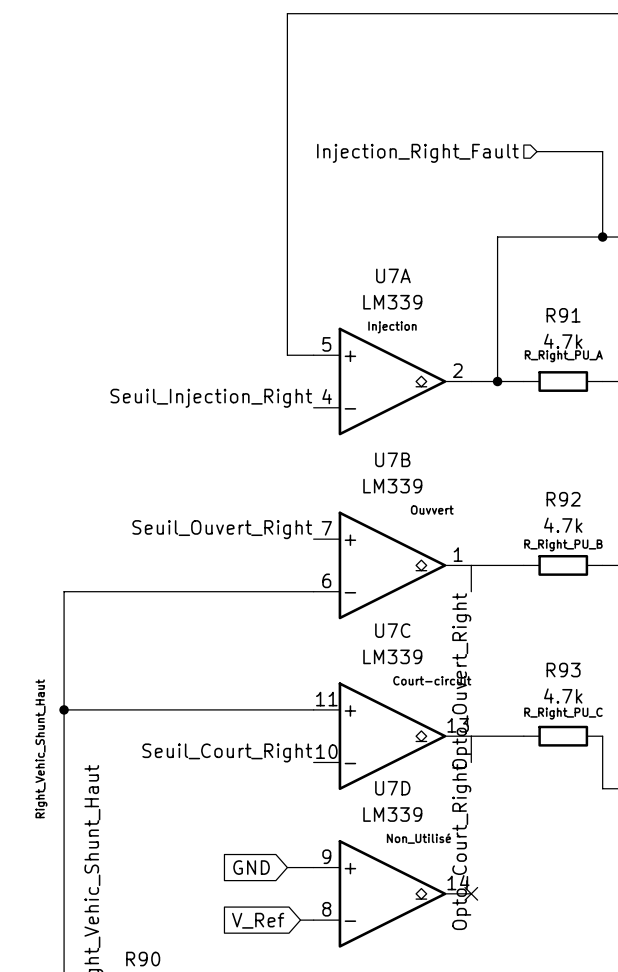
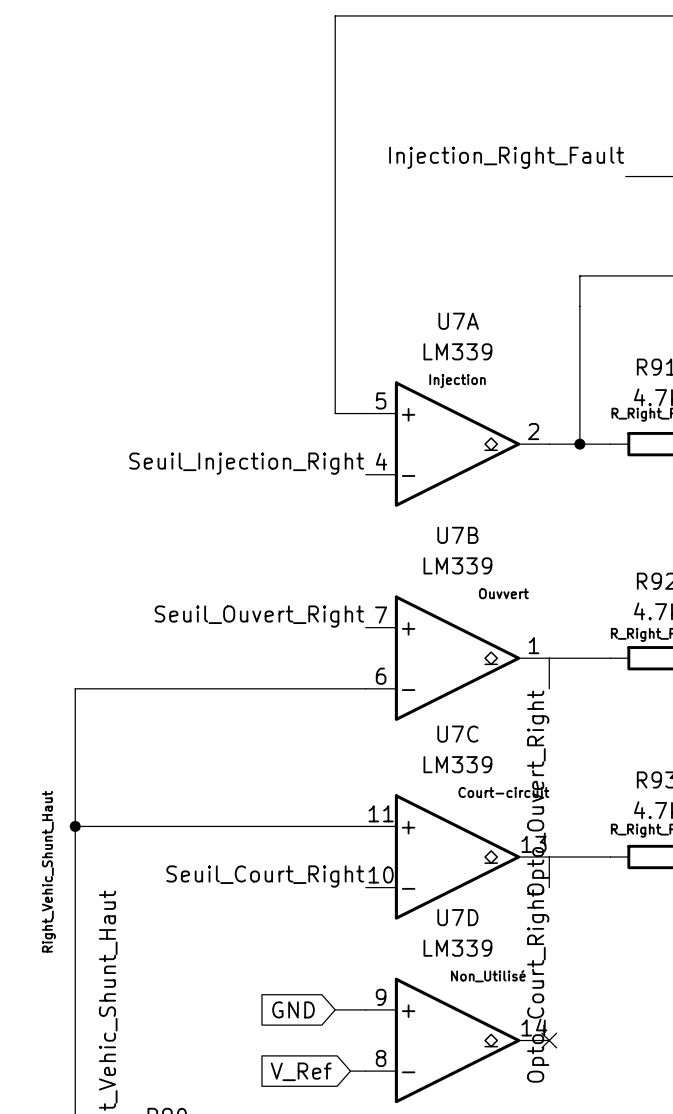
label: none -> Injection_Right_Fault (506, 157)
hierarchical label: Injection_Right_Fault (417, 153) -> none

